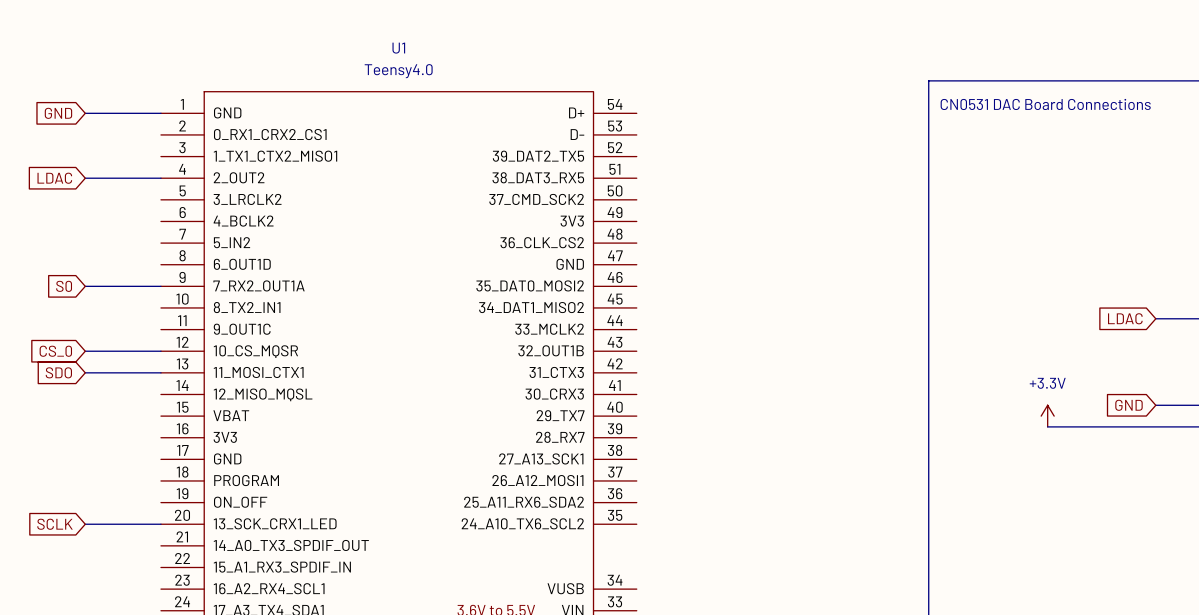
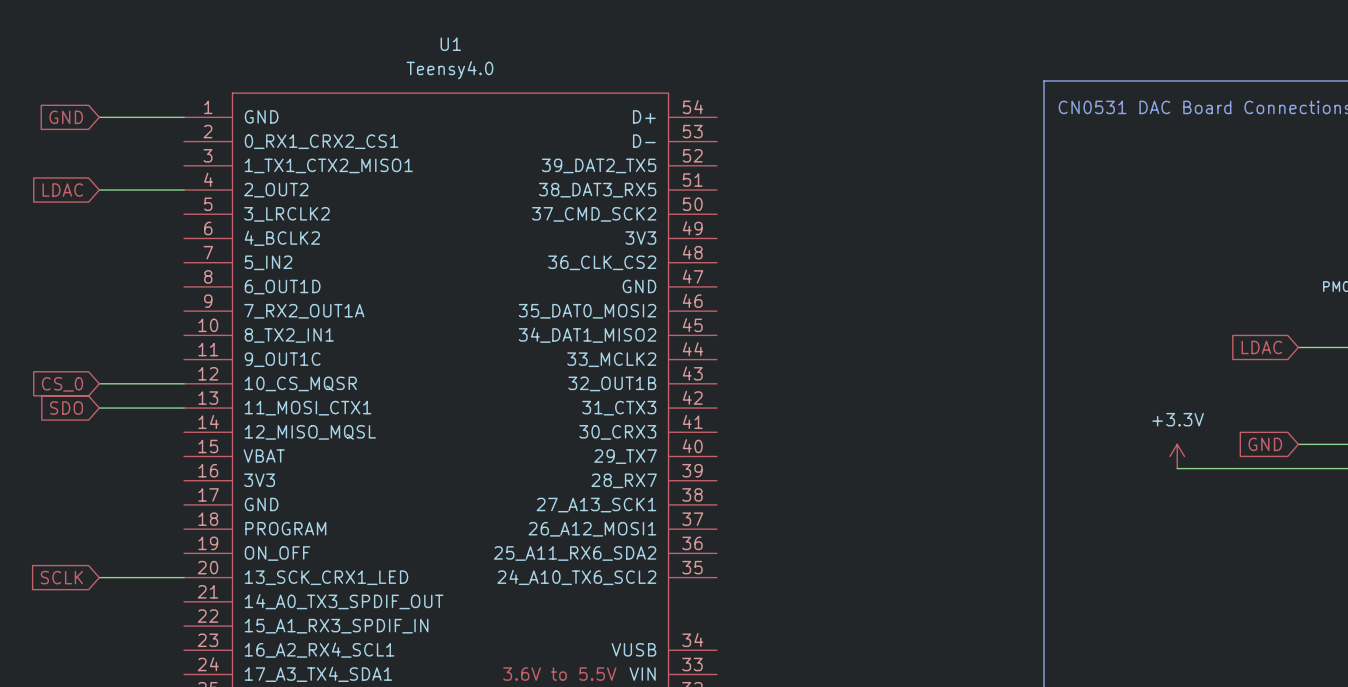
global label: S0 (64, 286) -> none
wire: (85, 286) (160, 286) -> none

